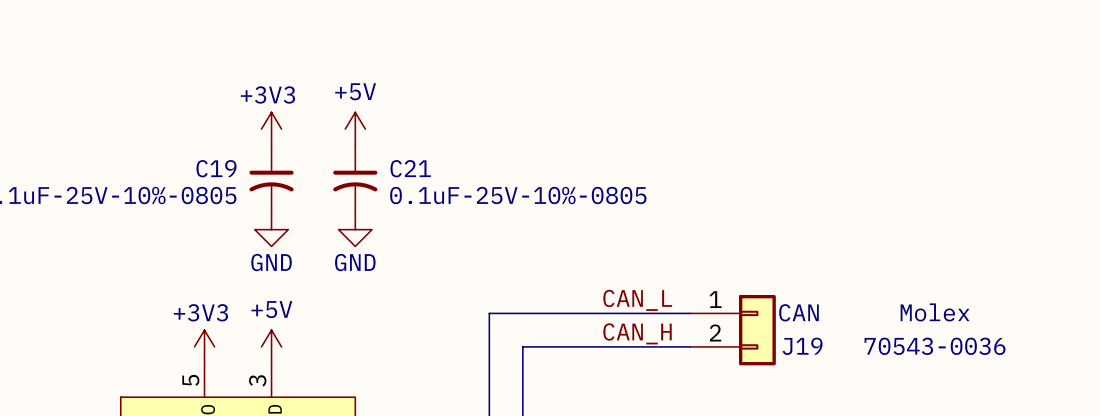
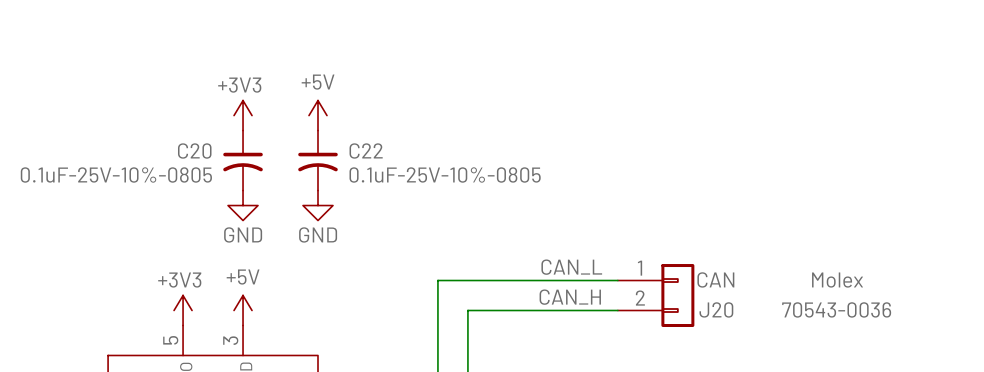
C19 name: C19 (216, 168) -> C20 (194, 151)
C21 name: C21 (410, 168) -> C22 (366, 151)
J19 name: J19 (802, 346) -> J20 (716, 309)

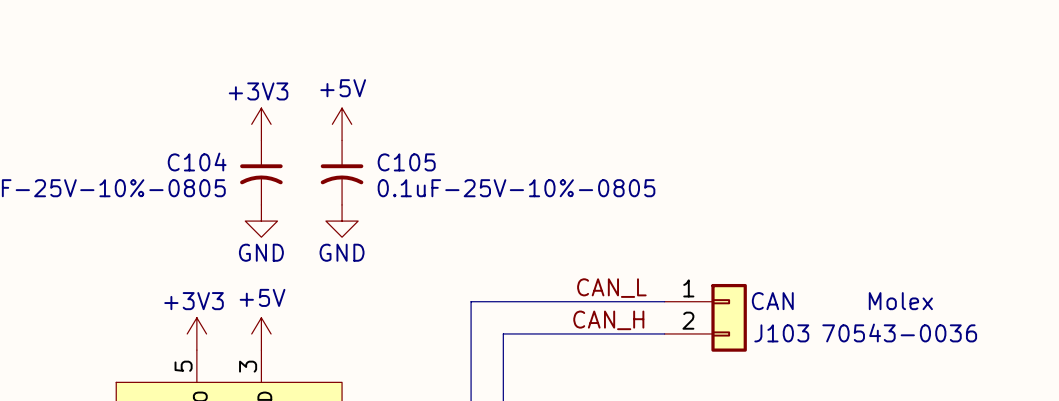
C20 name: C20 (194, 151) -> C104 (197, 162)
C22 name: C22 (366, 151) -> C105 (406, 162)
J20 name: J20 (716, 309) -> J103 (781, 333)

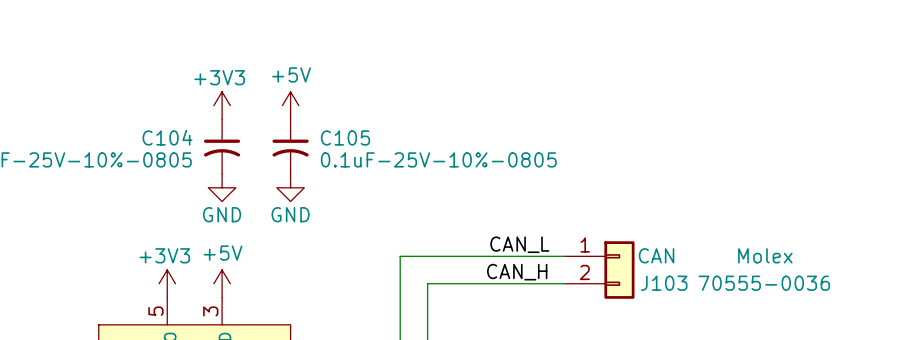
J103 text: 70543-0036 (899, 332) -> 70555-0036 (764, 283)

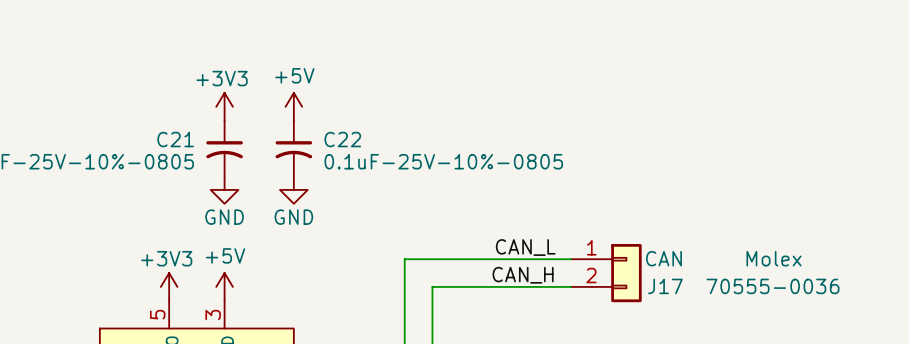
C104 name: C104 (167, 137) -> C21 (175, 139)
C105 name: C105 (345, 137) -> C22 (342, 139)
J103 name: J103 (664, 283) -> J17 (665, 286)

